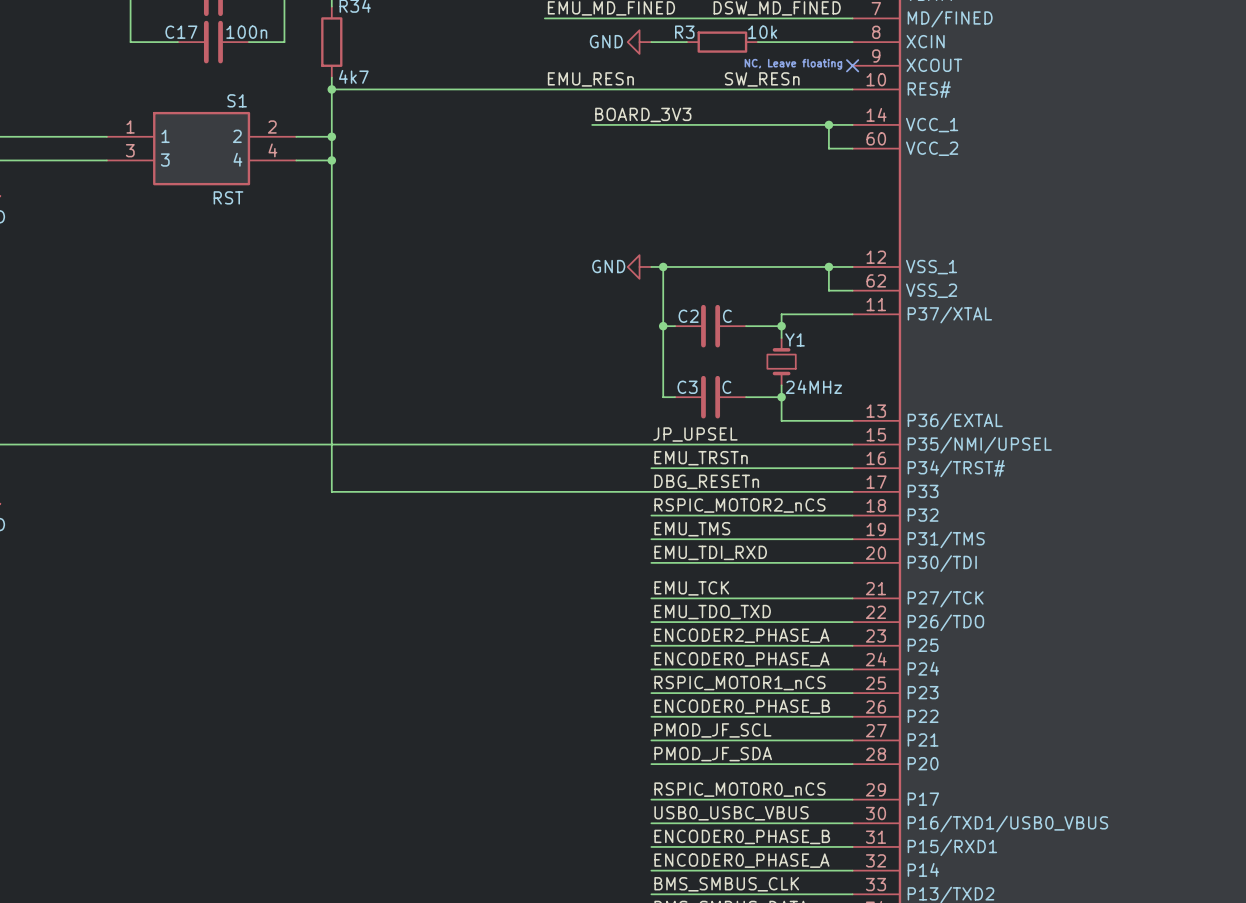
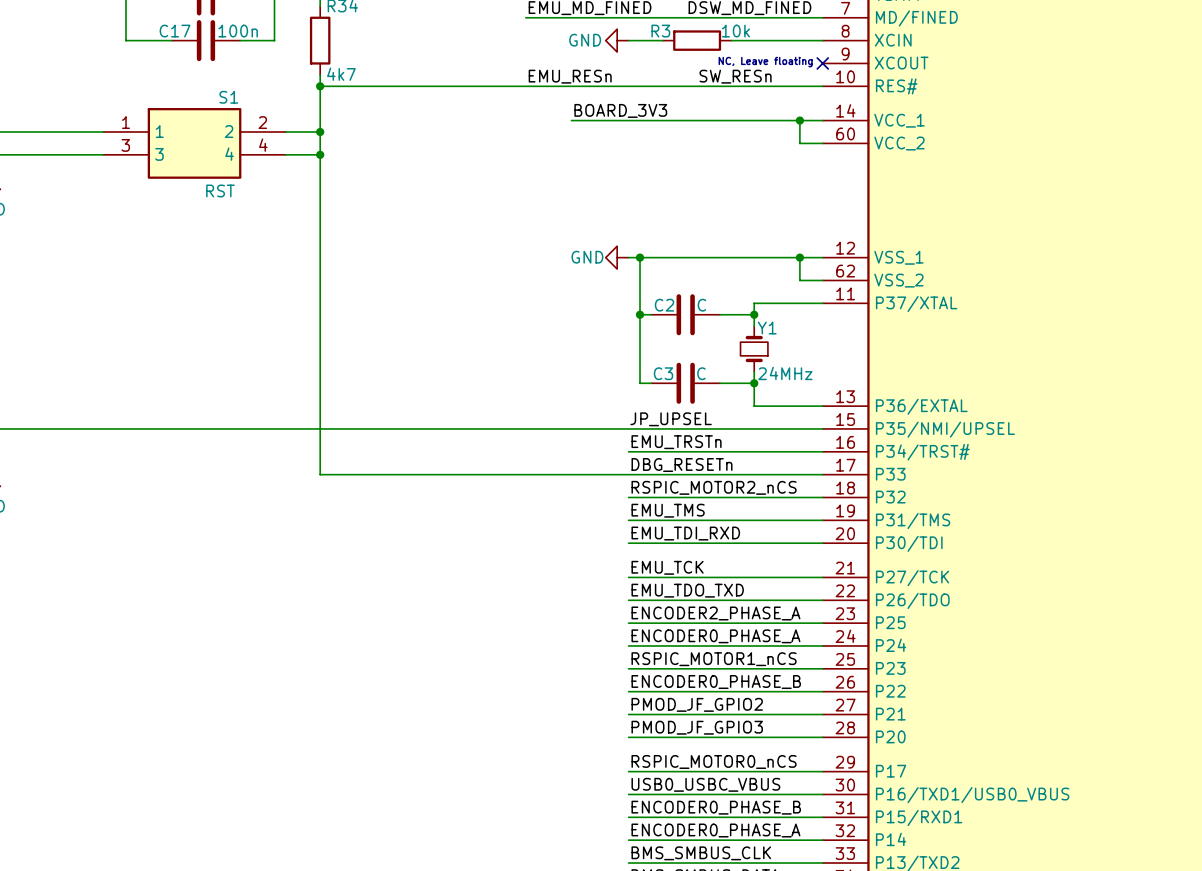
label: PMOD_JF_SCL (712, 730) -> PMOD_JF_GPIO2 (697, 704)
label: PMOD_JF_SDA (713, 754) -> PMOD_JF_GPIO3 (697, 727)

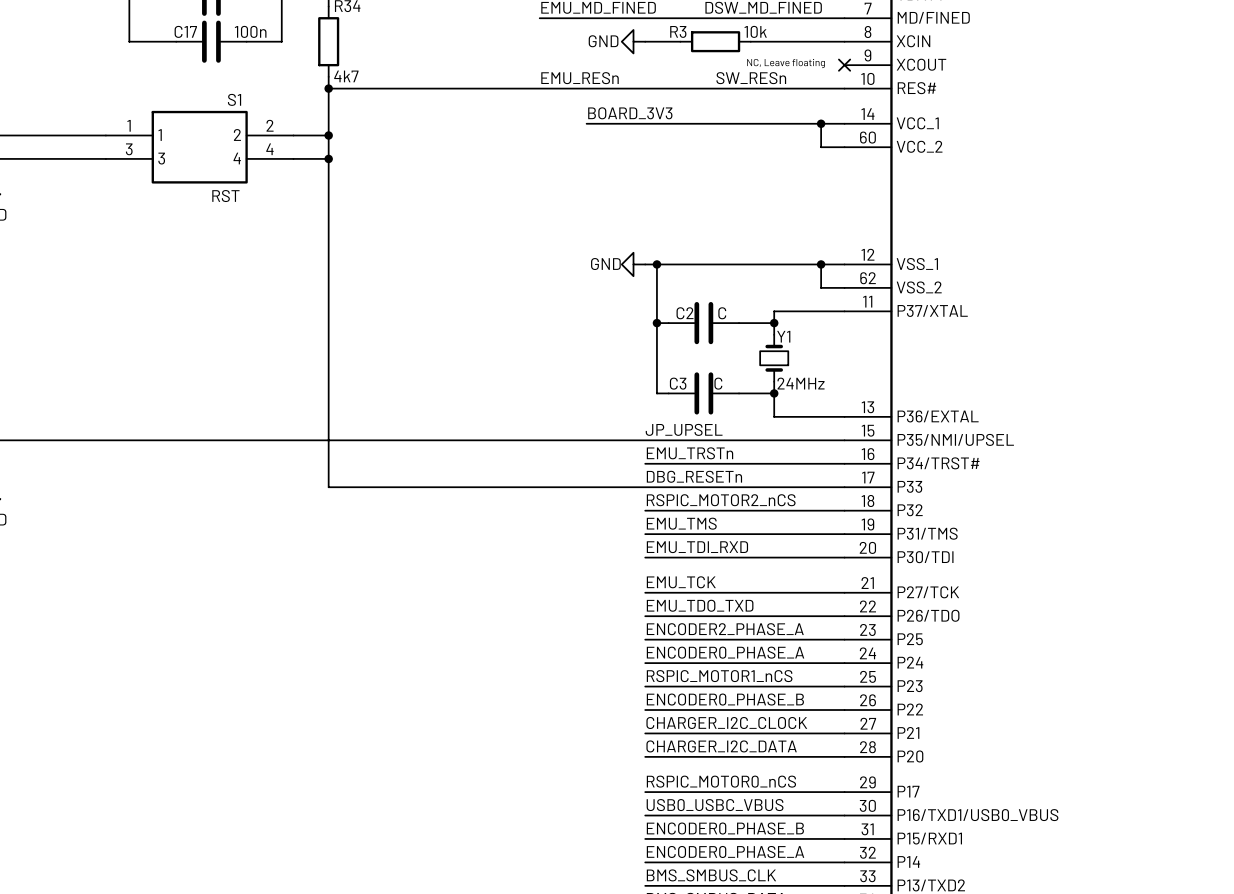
label: PMOD_JF_GPIO2 (697, 704) -> CHARGER_I2C_CLOCK (726, 722)
label: PMOD_JF_GPIO3 (697, 727) -> CHARGER_I2C_DATA (721, 746)

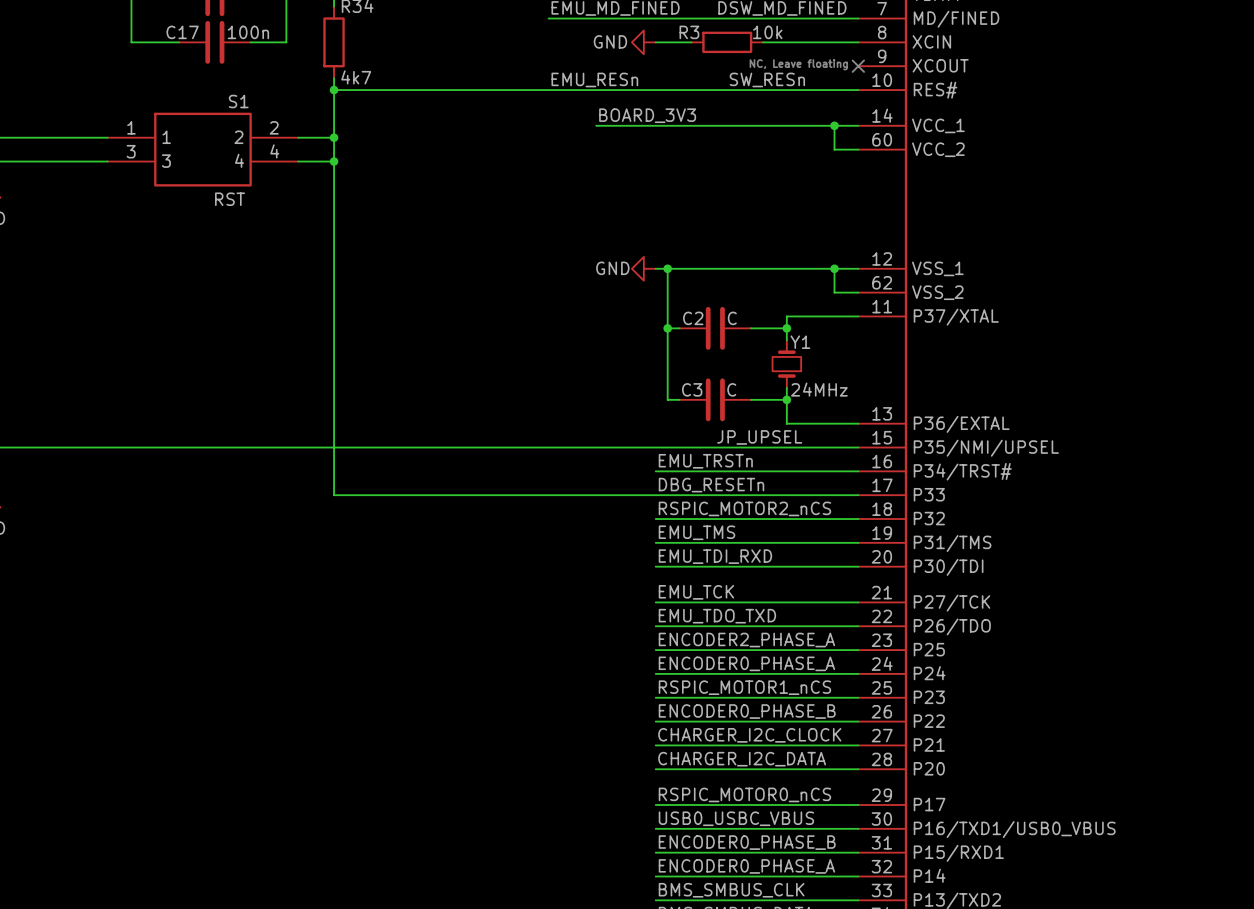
label position: JP_UPSEL (684, 429) -> JP_UPSEL (759, 437)

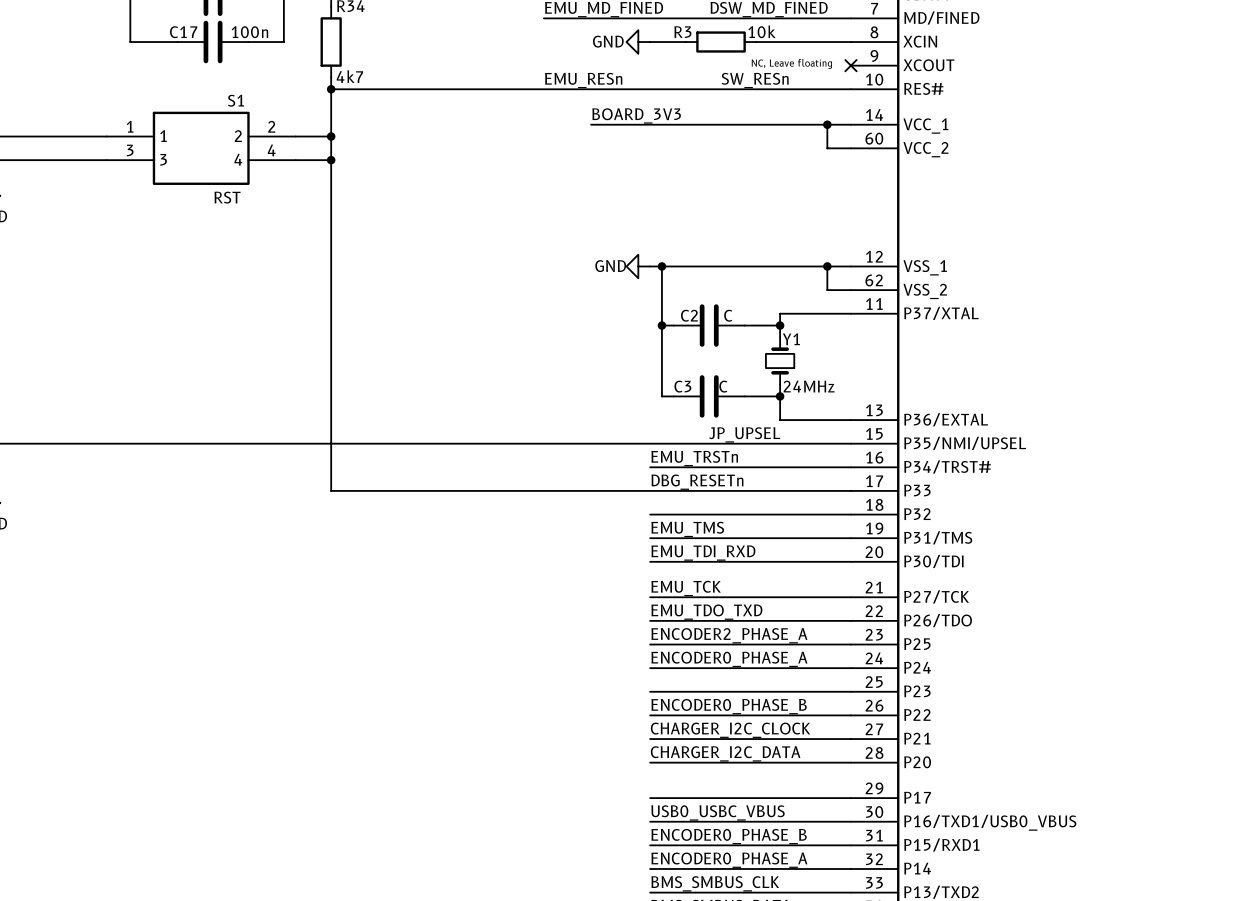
label: RSPIC_MOTOR2_nCS (744, 508) -> none
label: RSPIC_MOTOR1_nCS (744, 687) -> none
label: RSPIC_MOTOR0_nCS (744, 794) -> none

